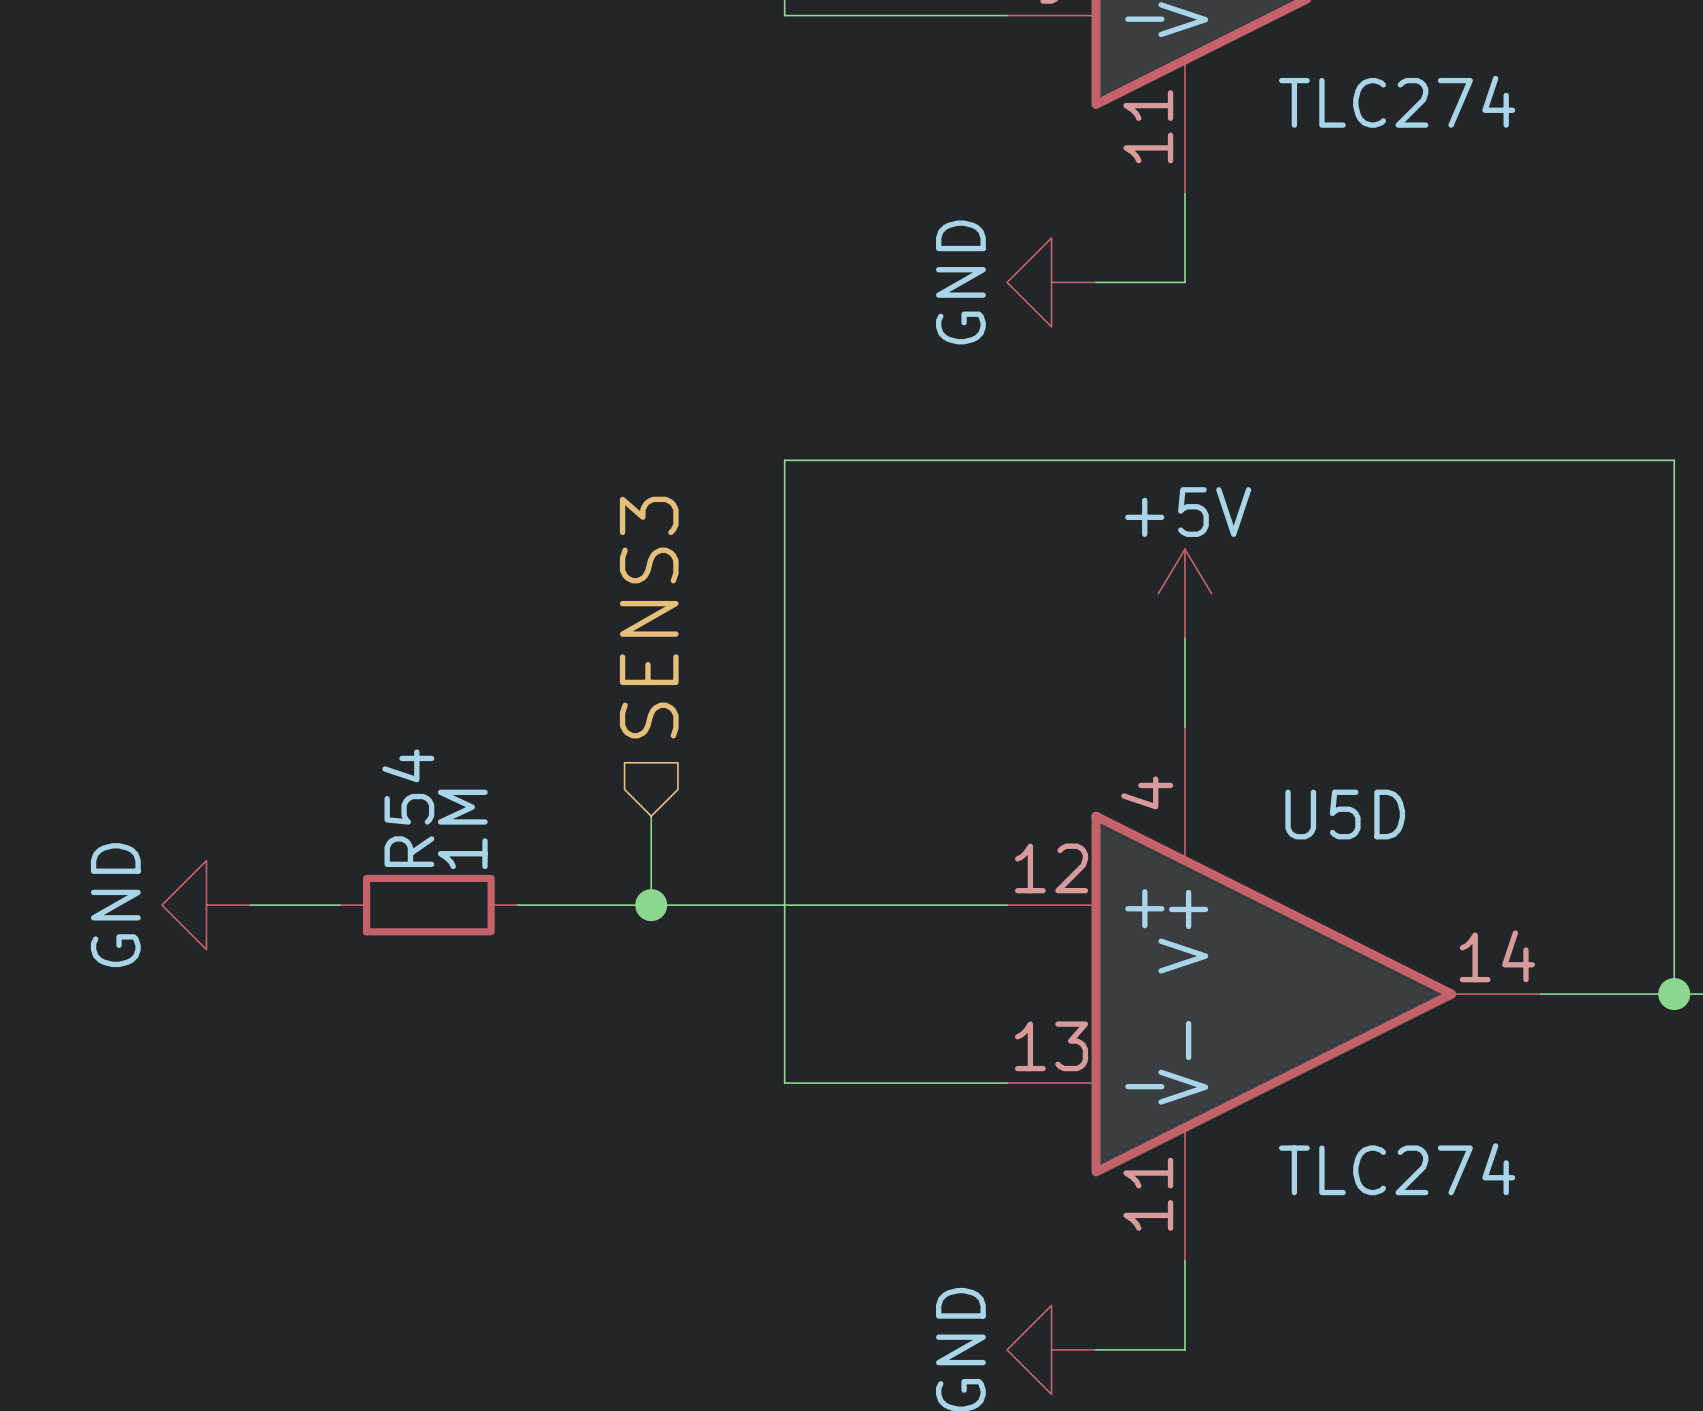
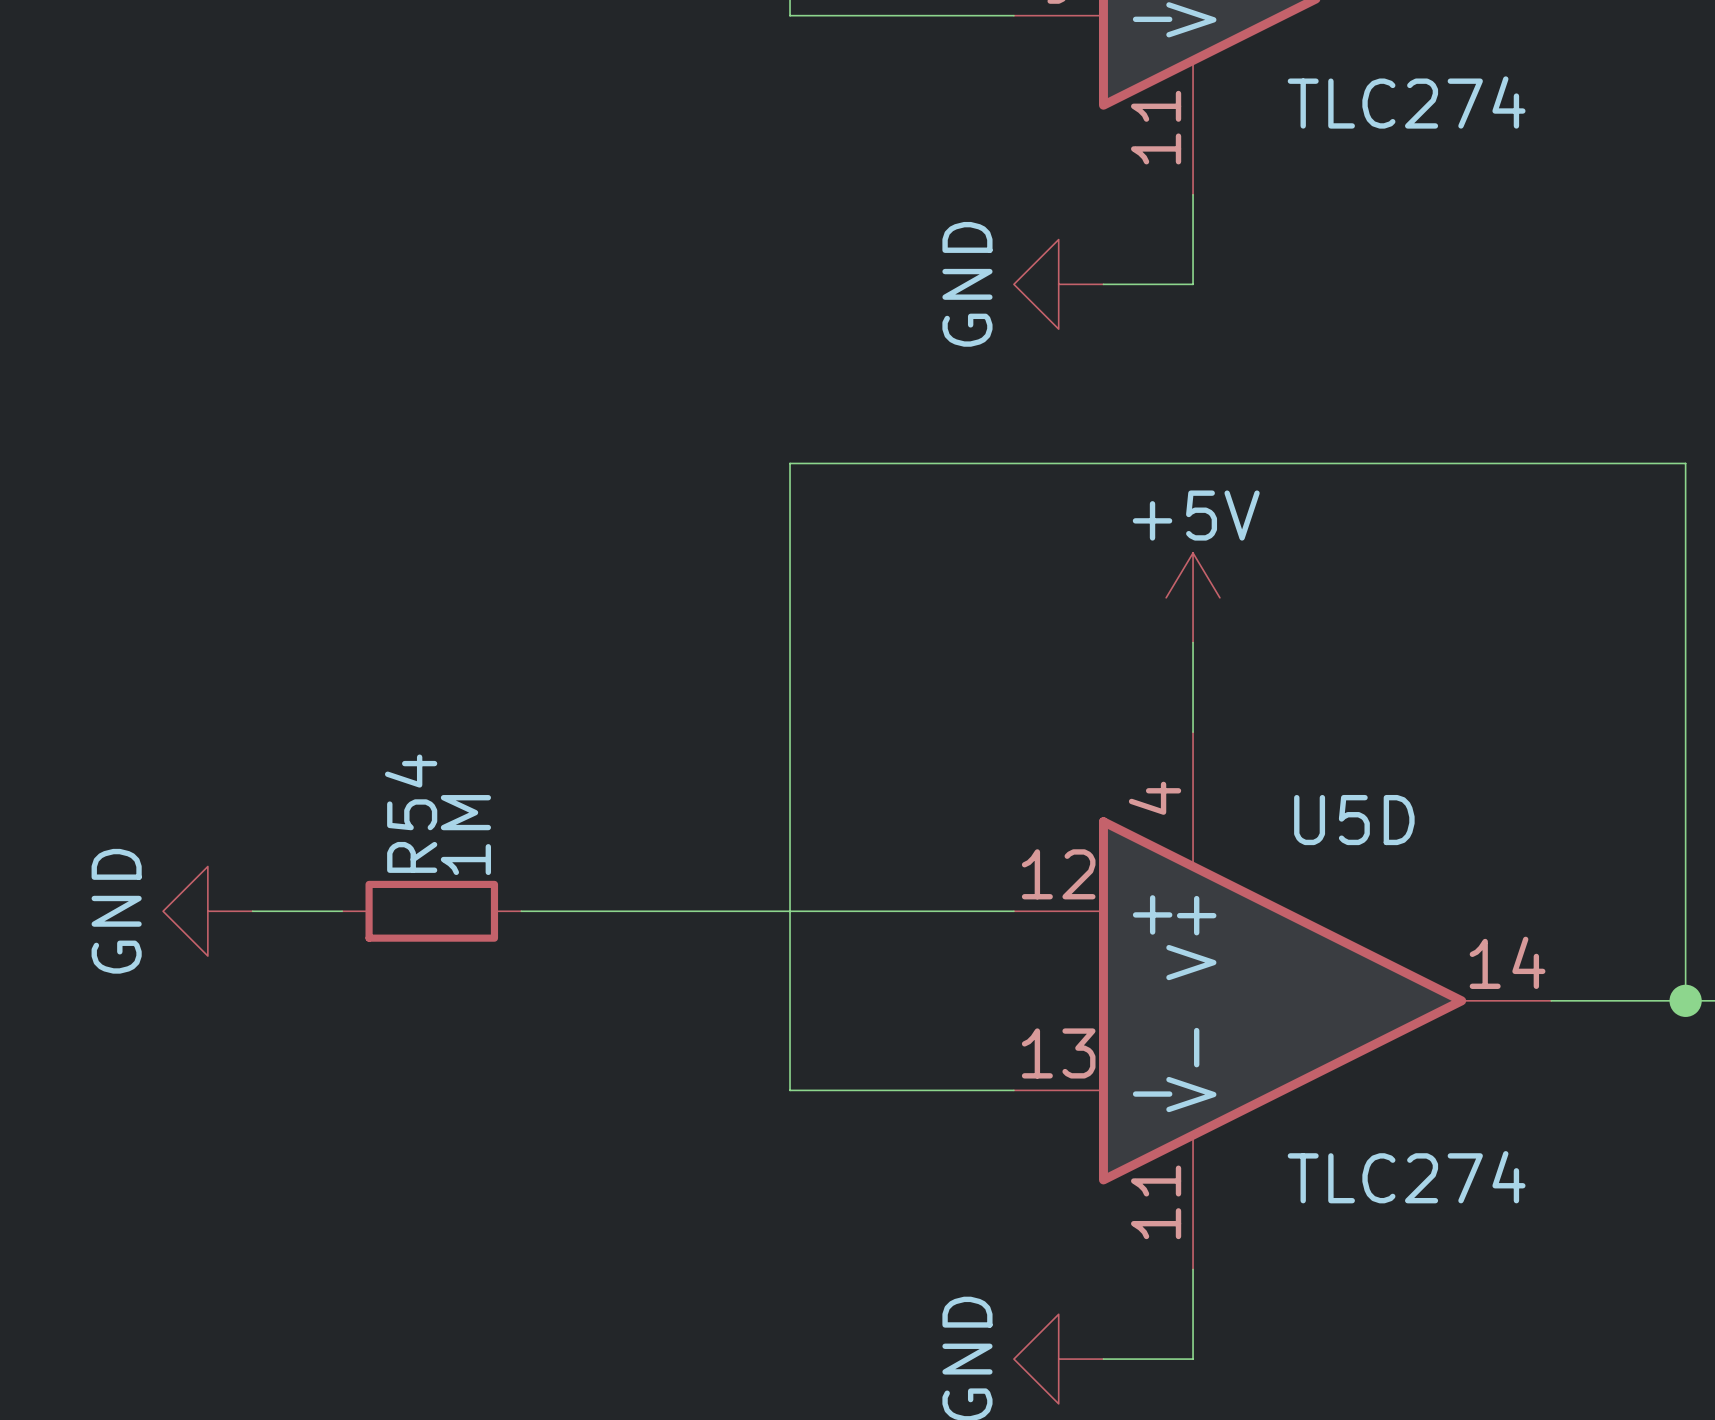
hierarchical label: SENS3 (649, 617) -> none
wire: (651, 816) (651, 905) -> none
junction: (651, 905) -> none

